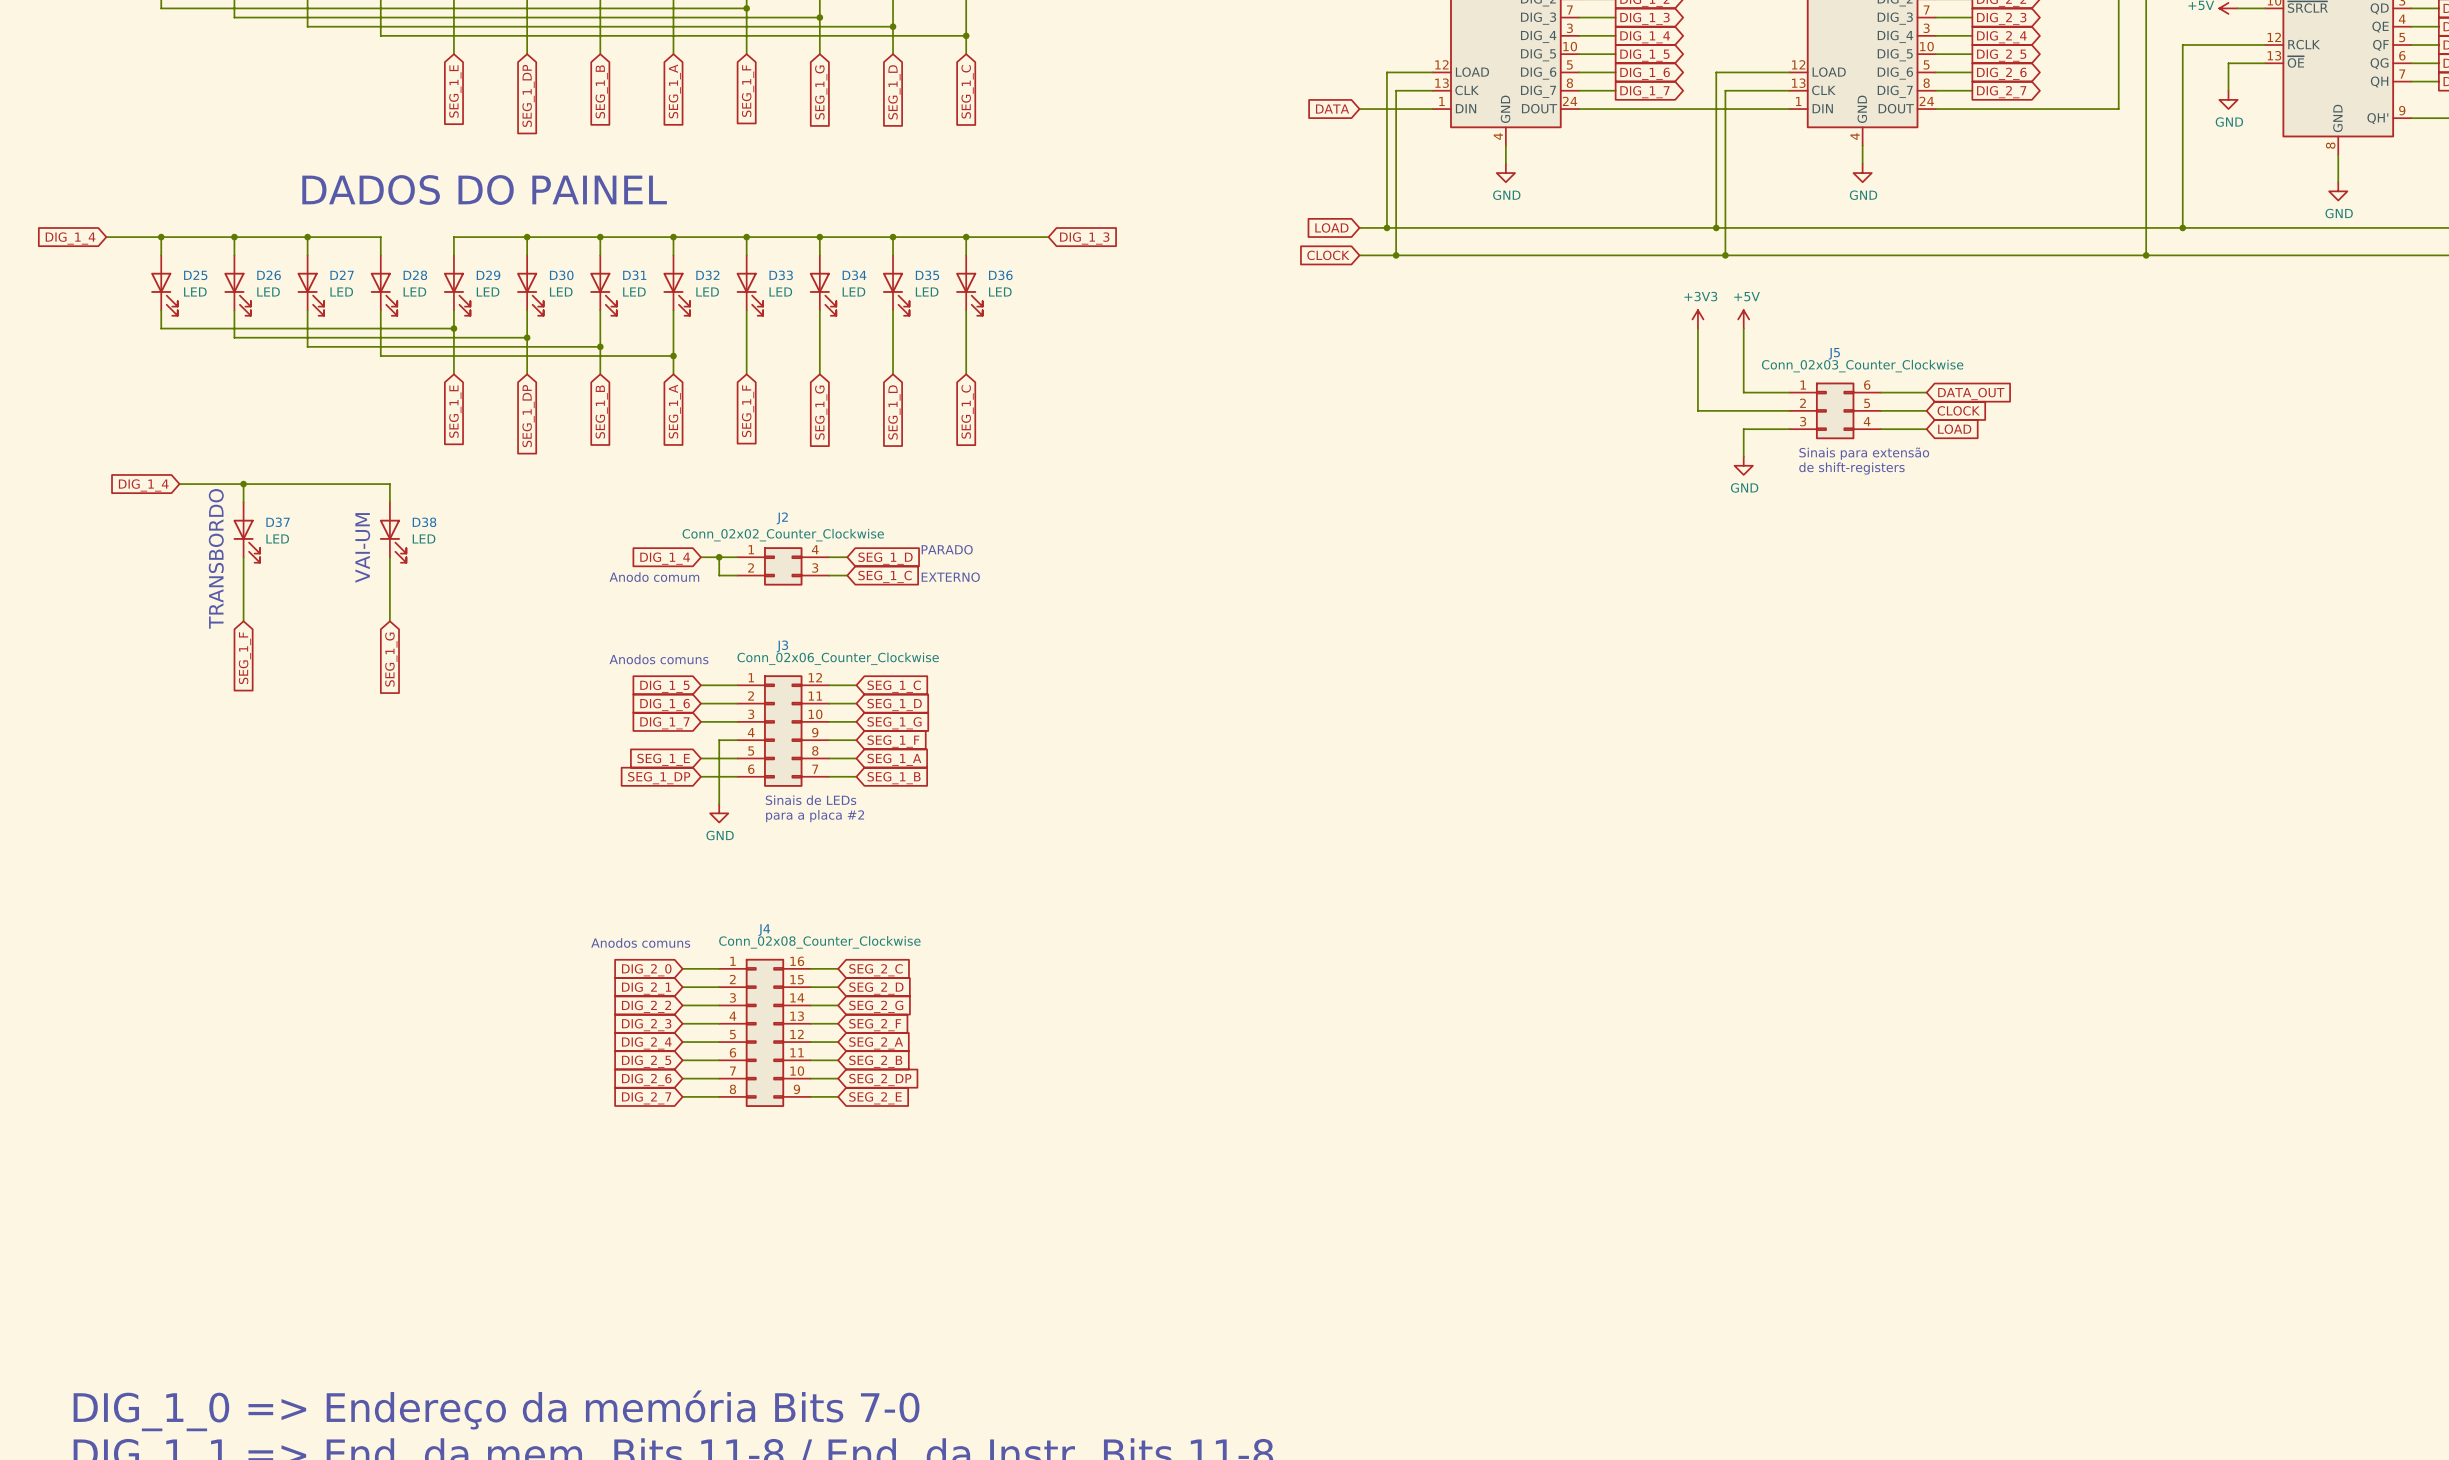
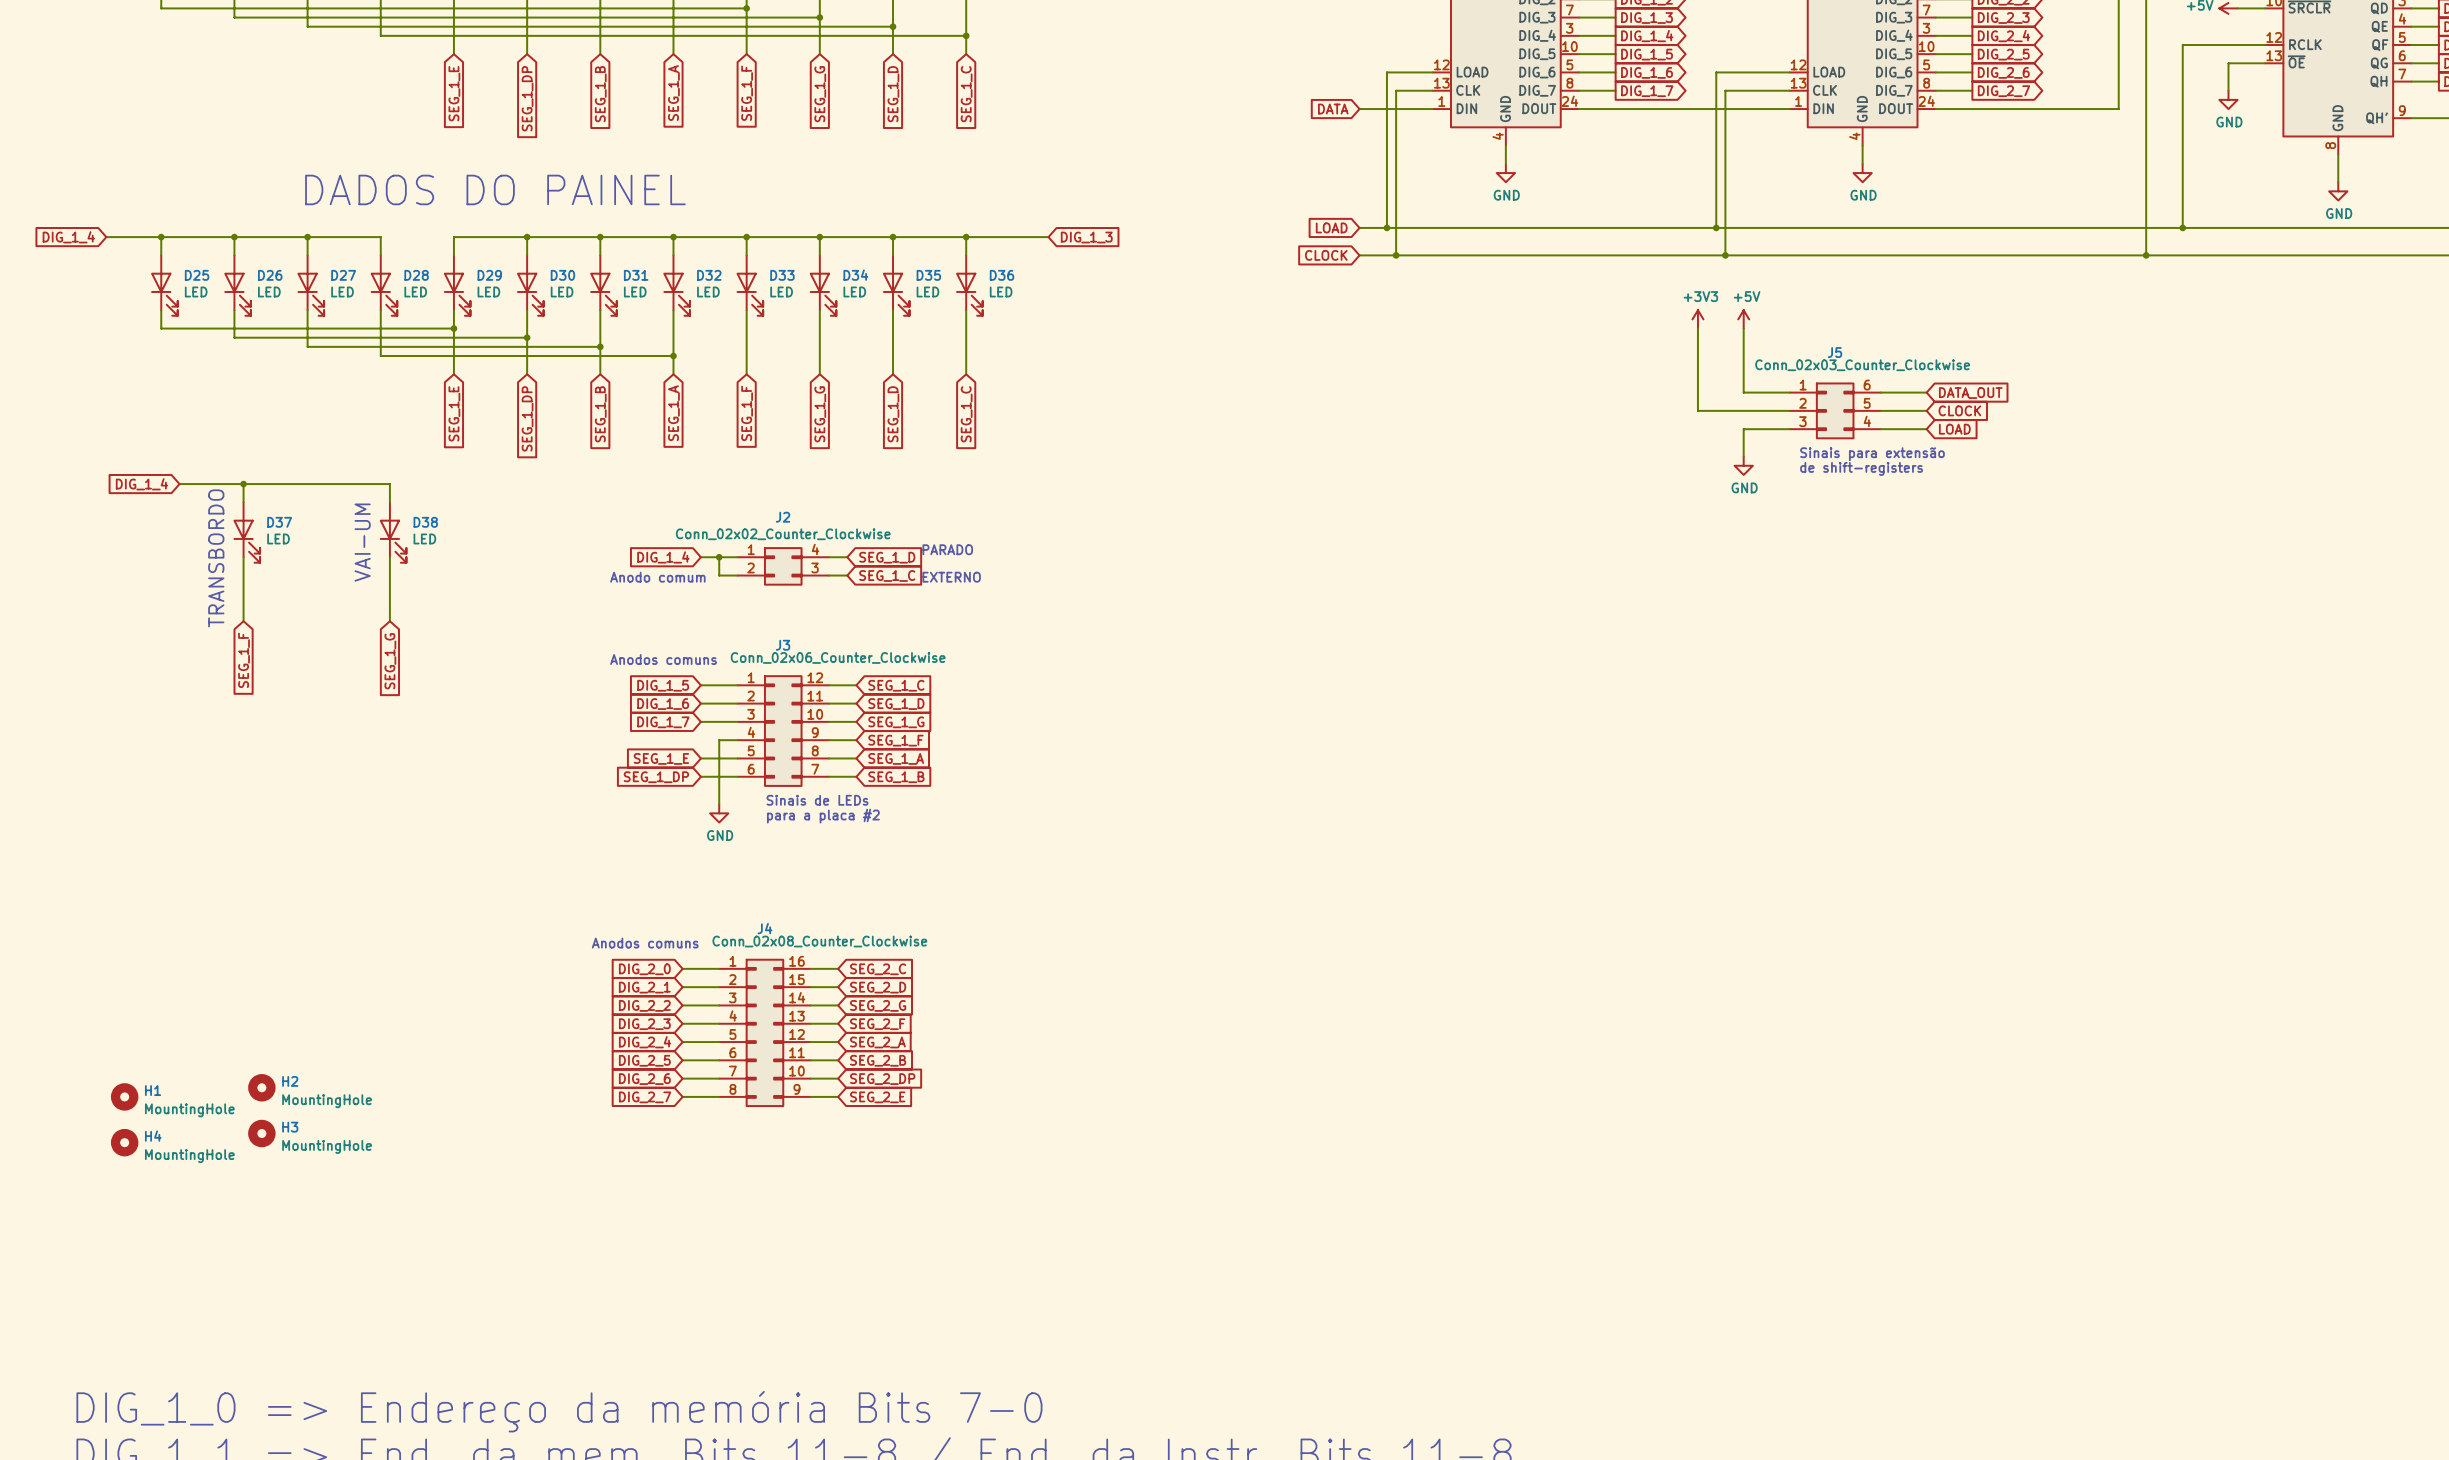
H2: none -> MountingHole (261, 1087)
H1: none -> MountingHole (124, 1096)
H3: none -> MountingHole (261, 1133)
H4: none -> MountingHole (124, 1142)

